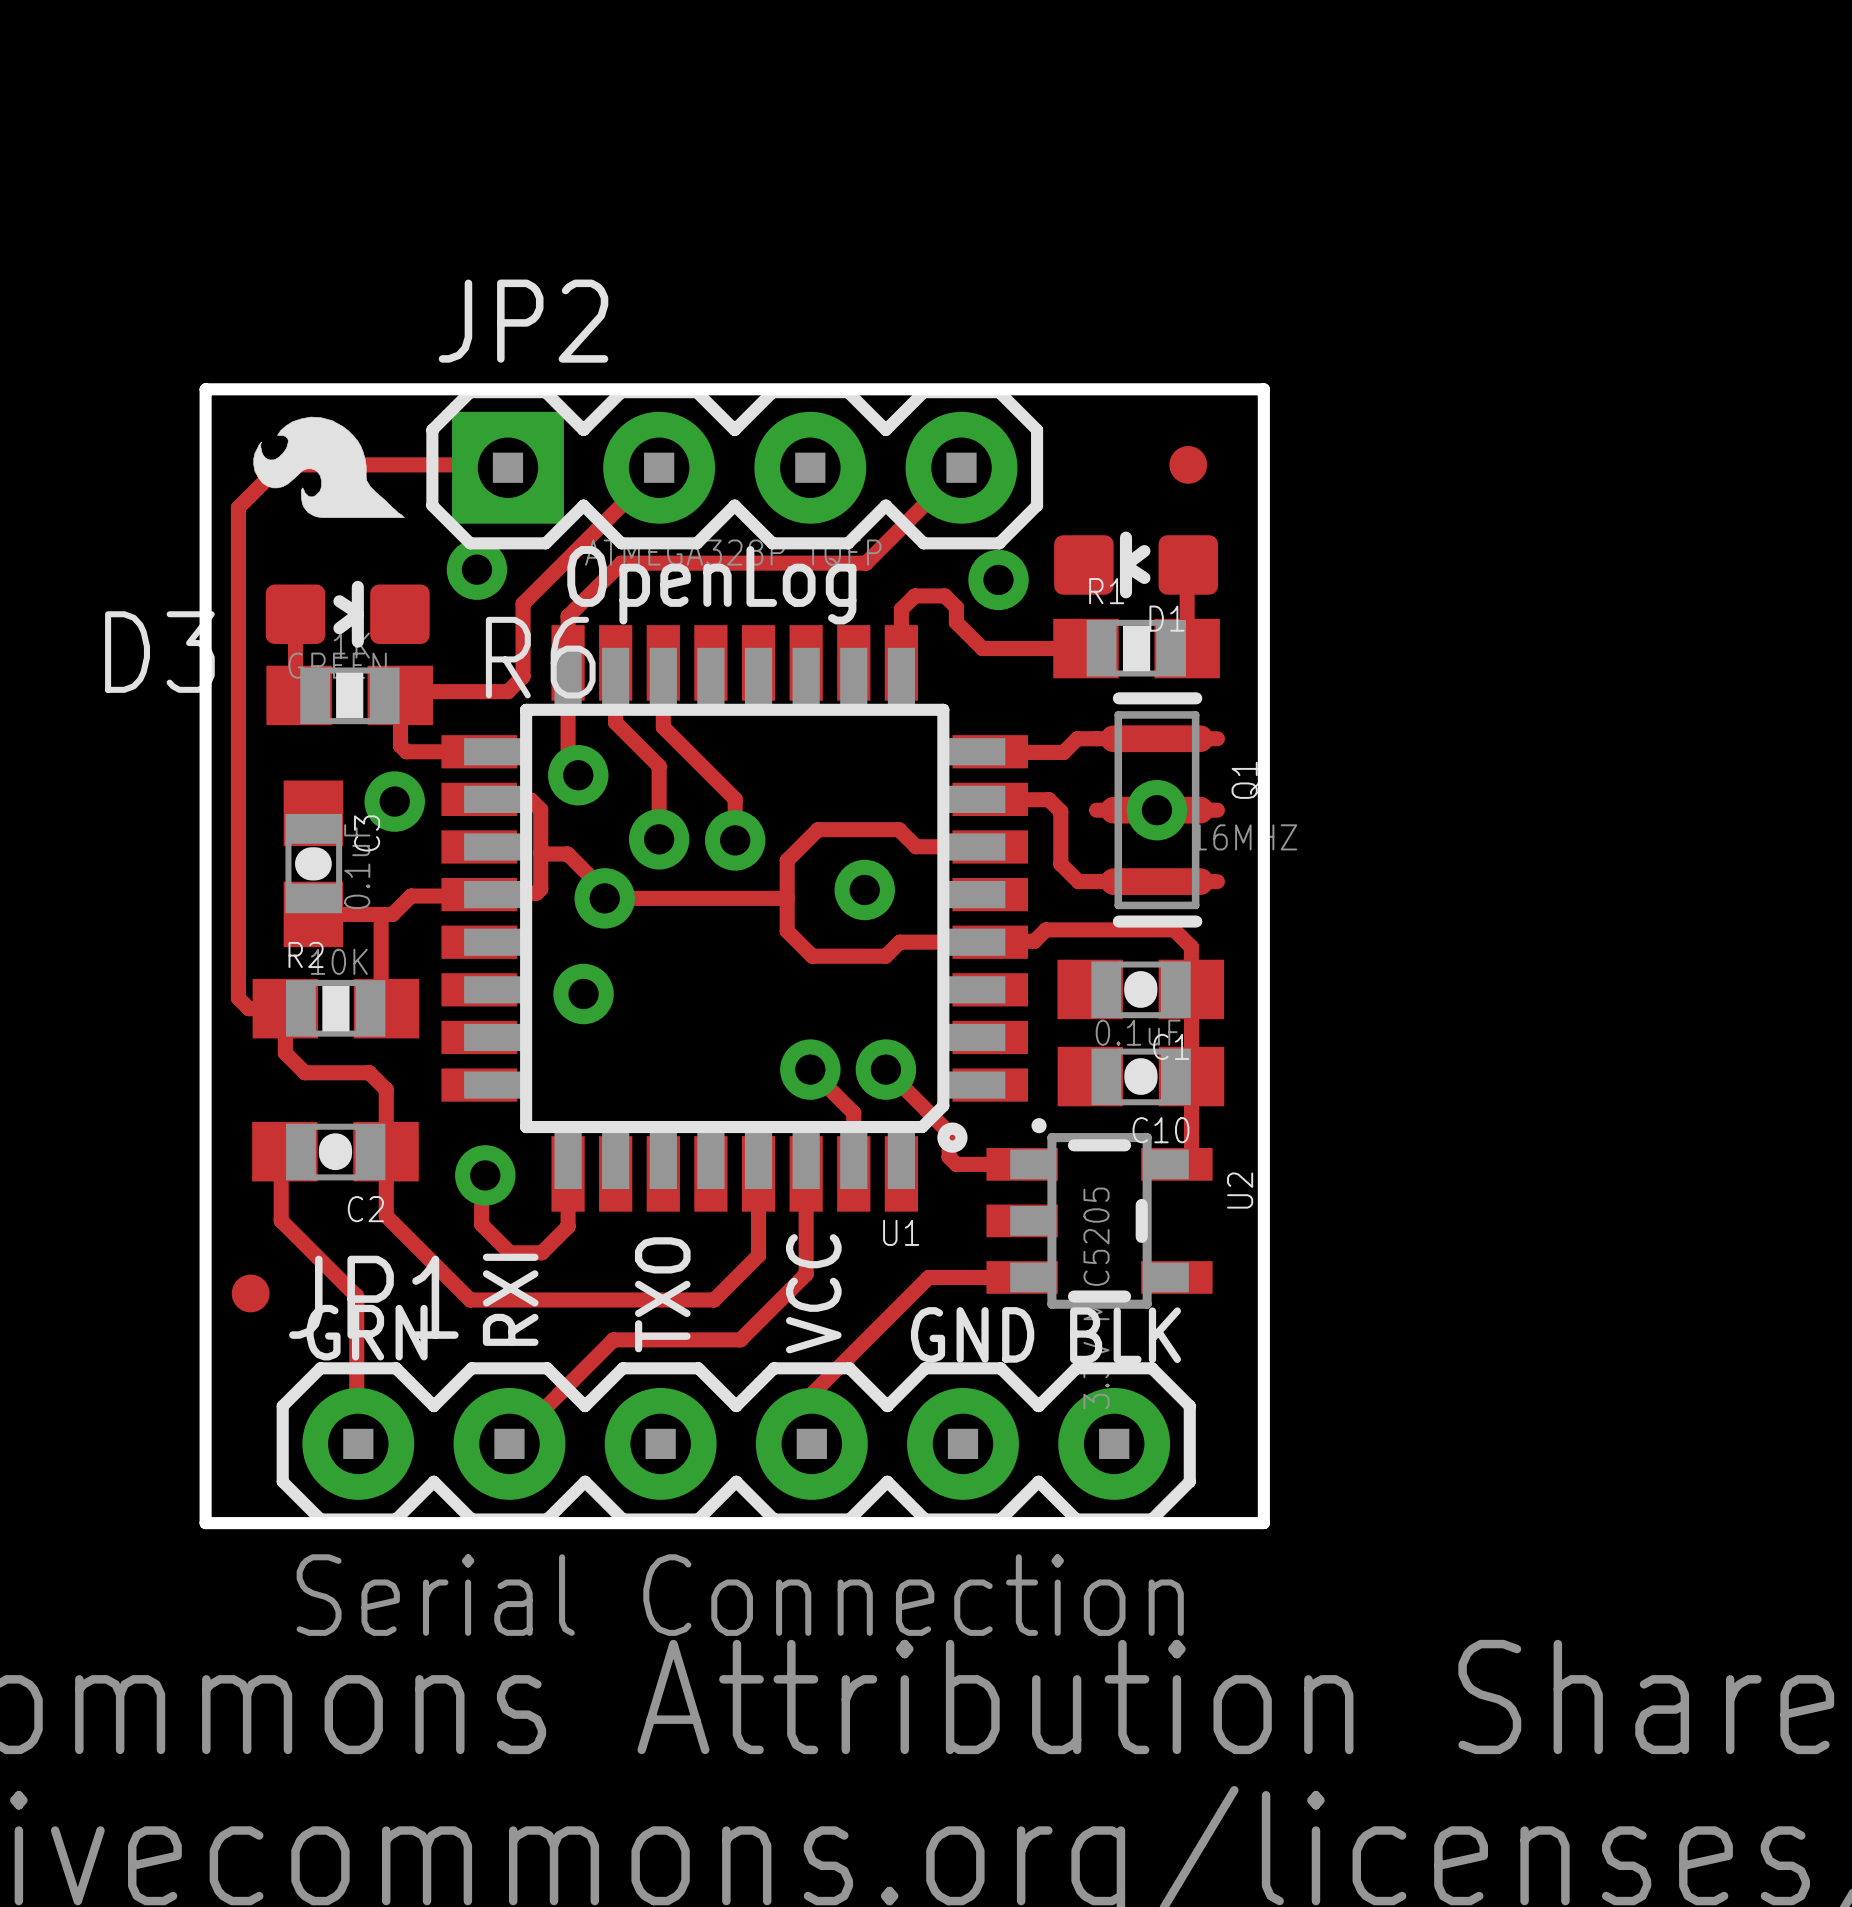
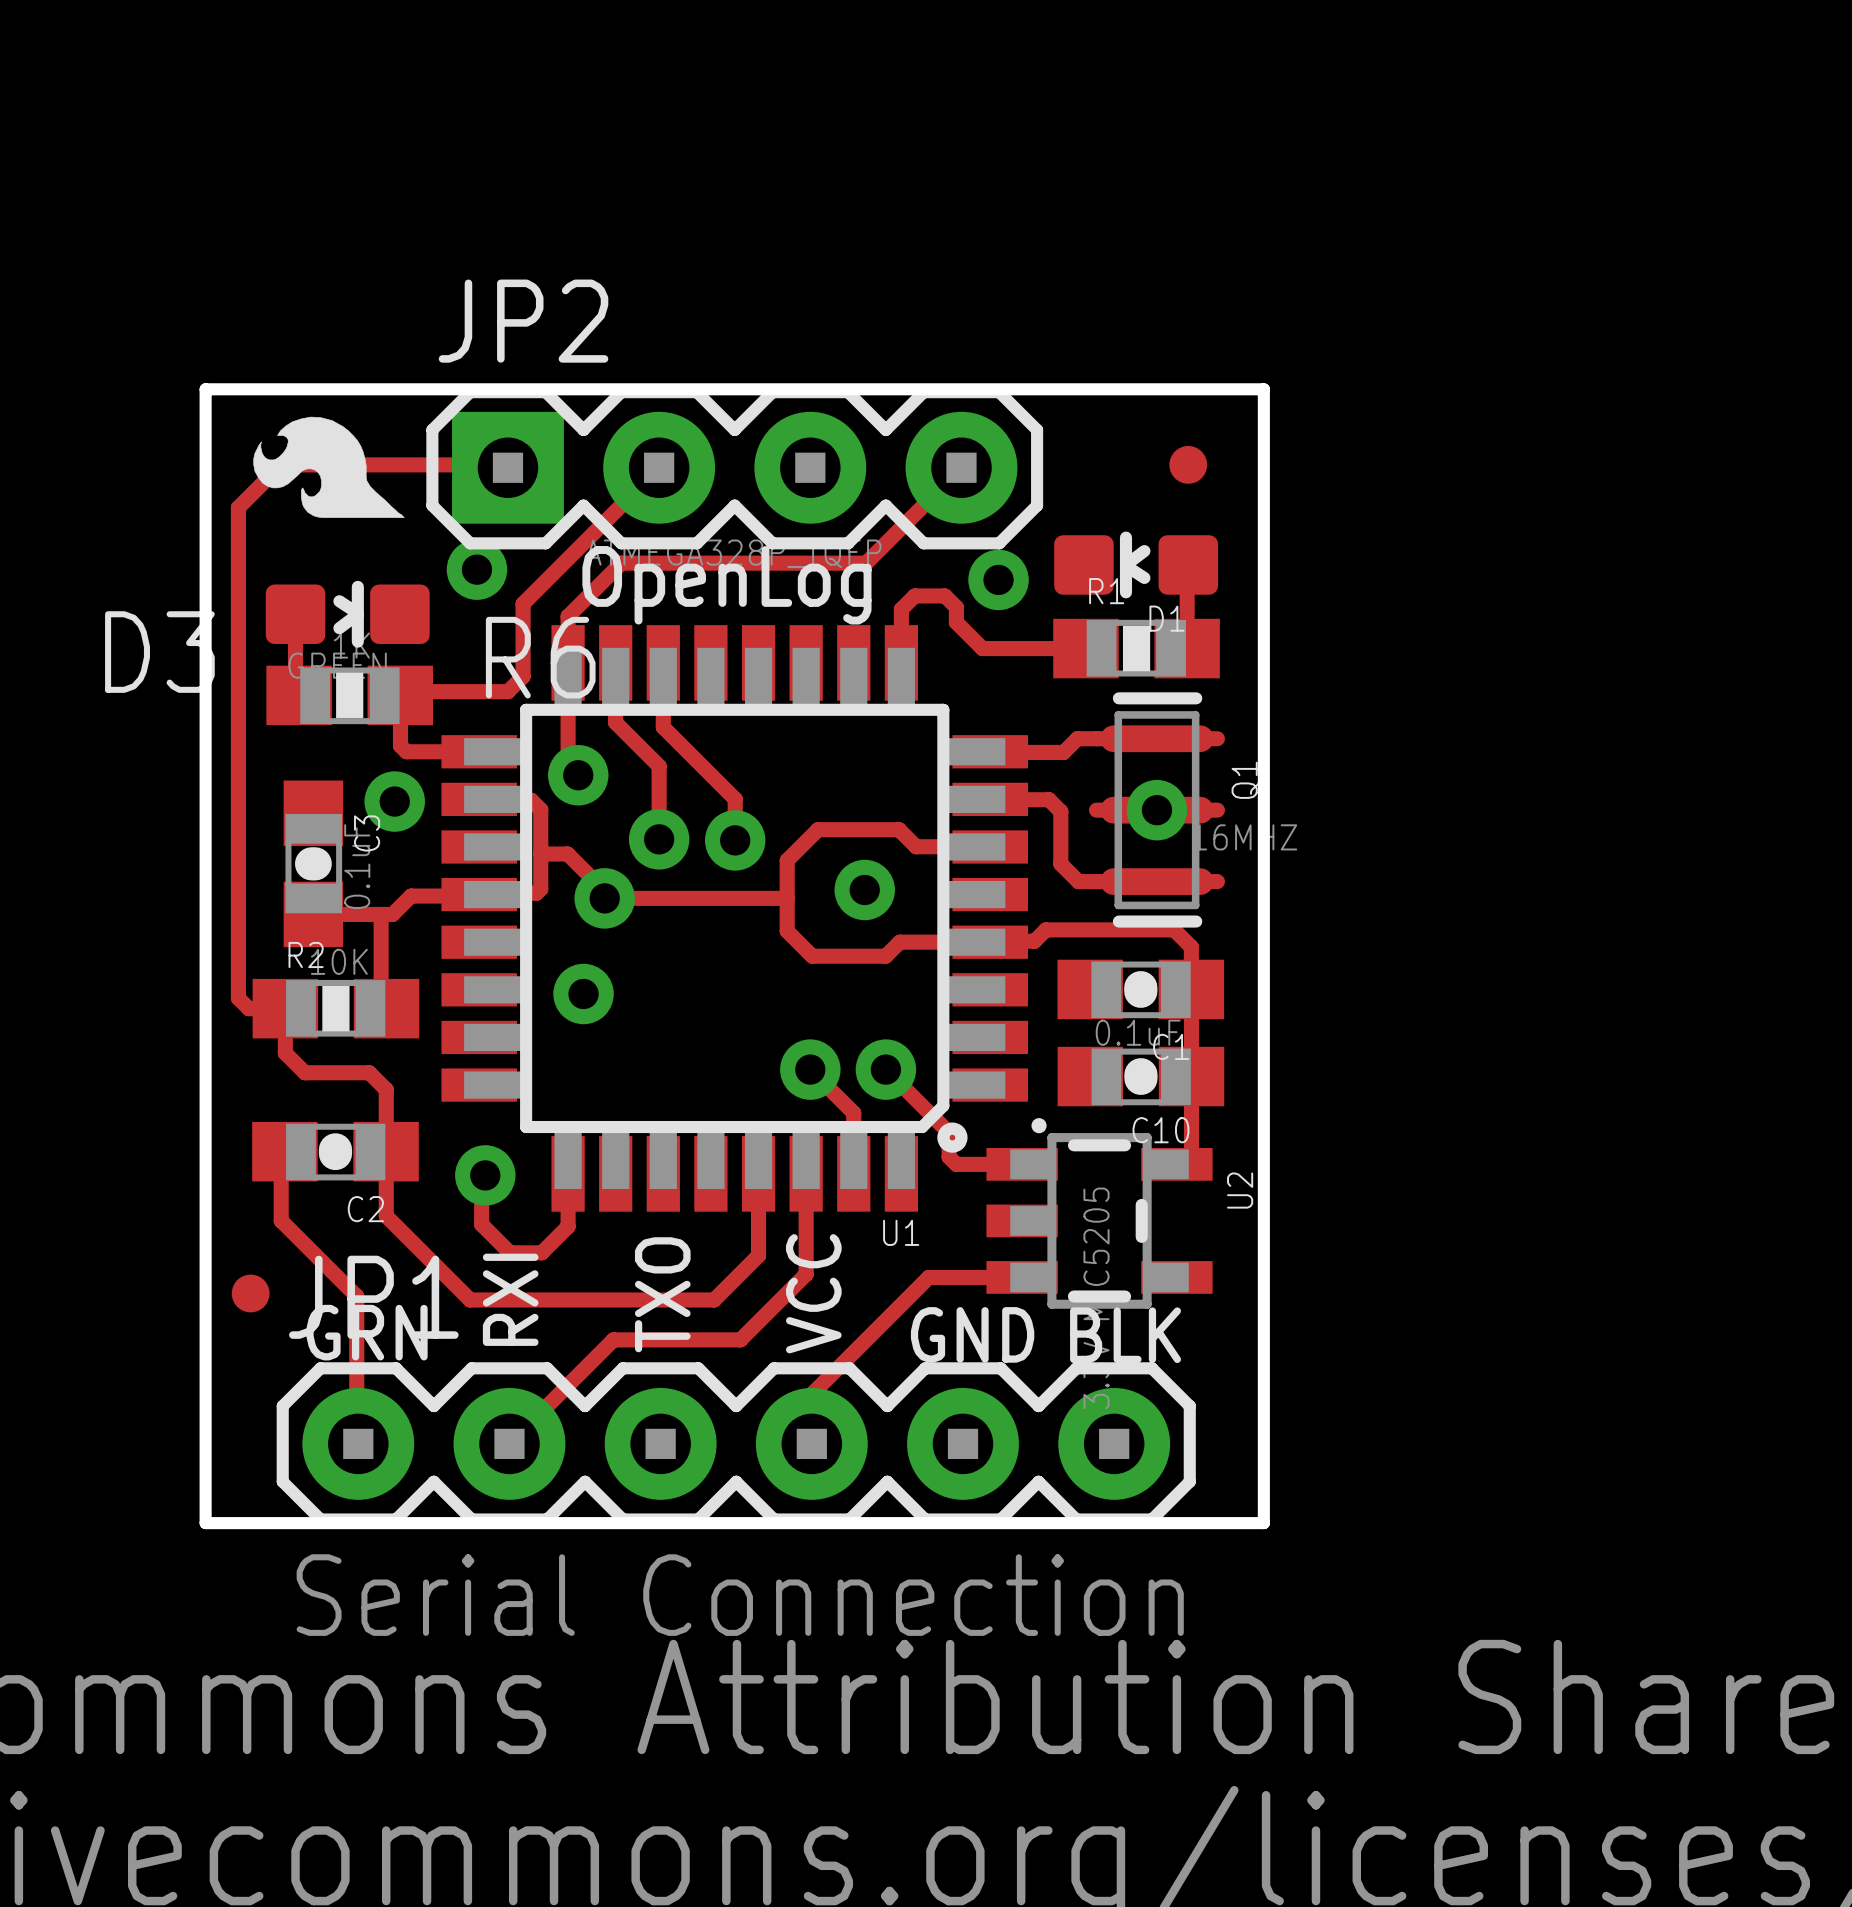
text position: OpenLog (711, 585) -> OpenLog (726, 585)

